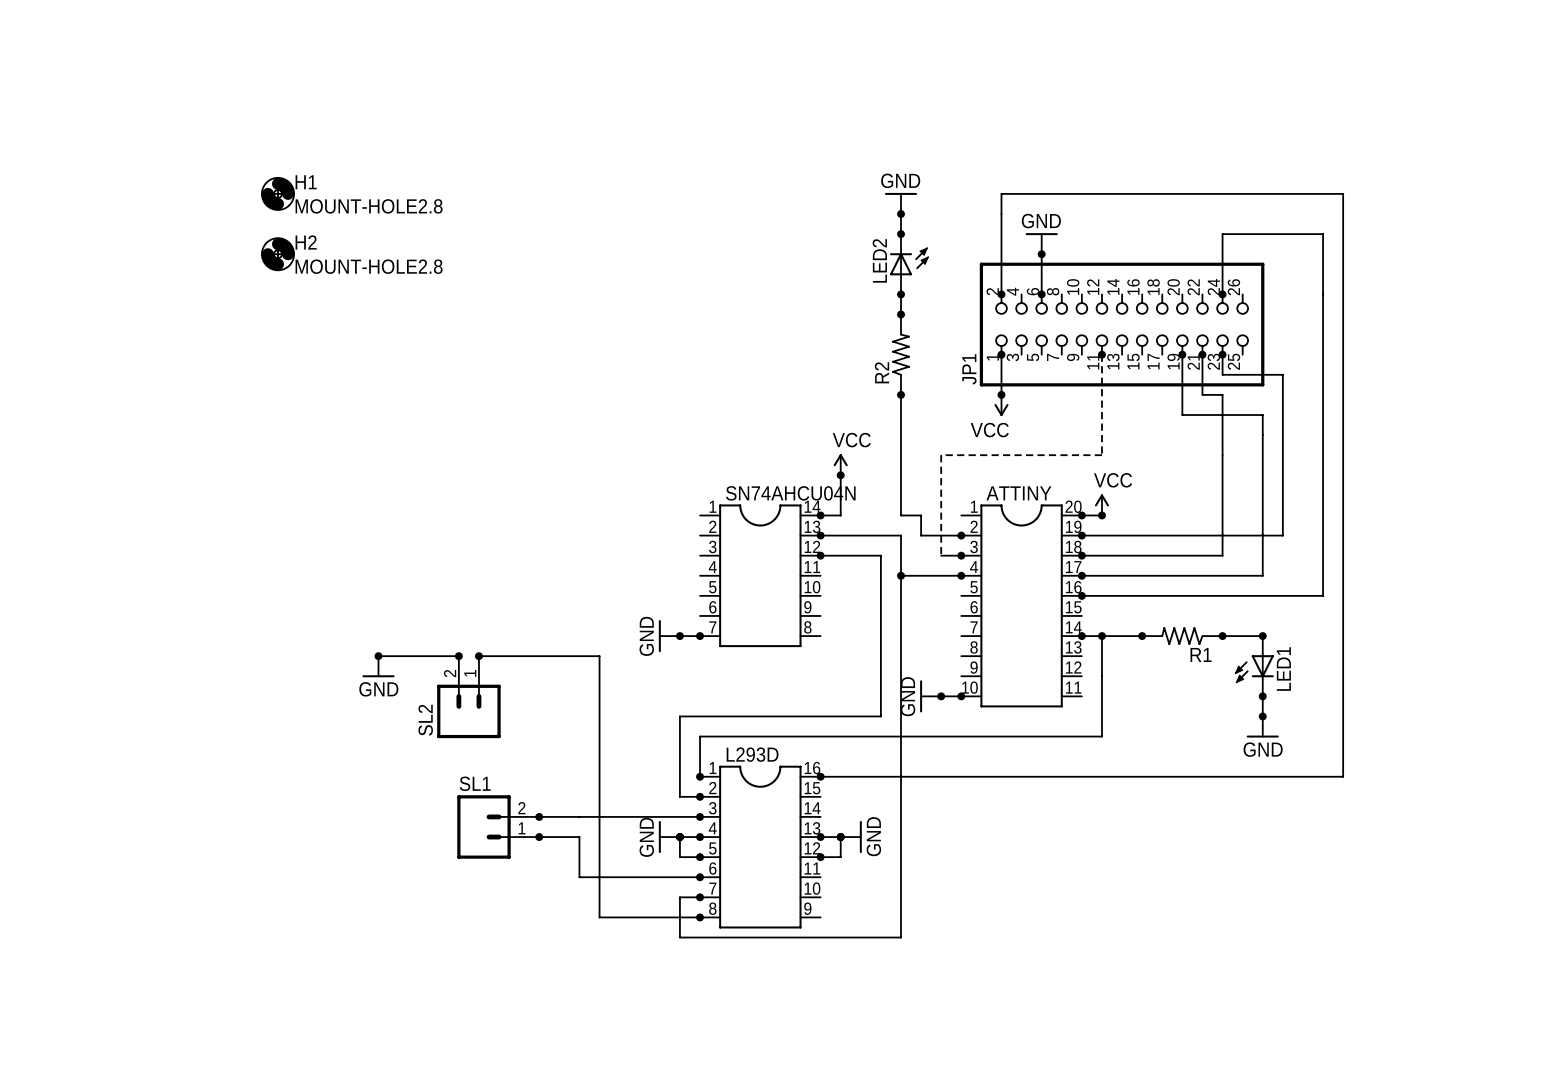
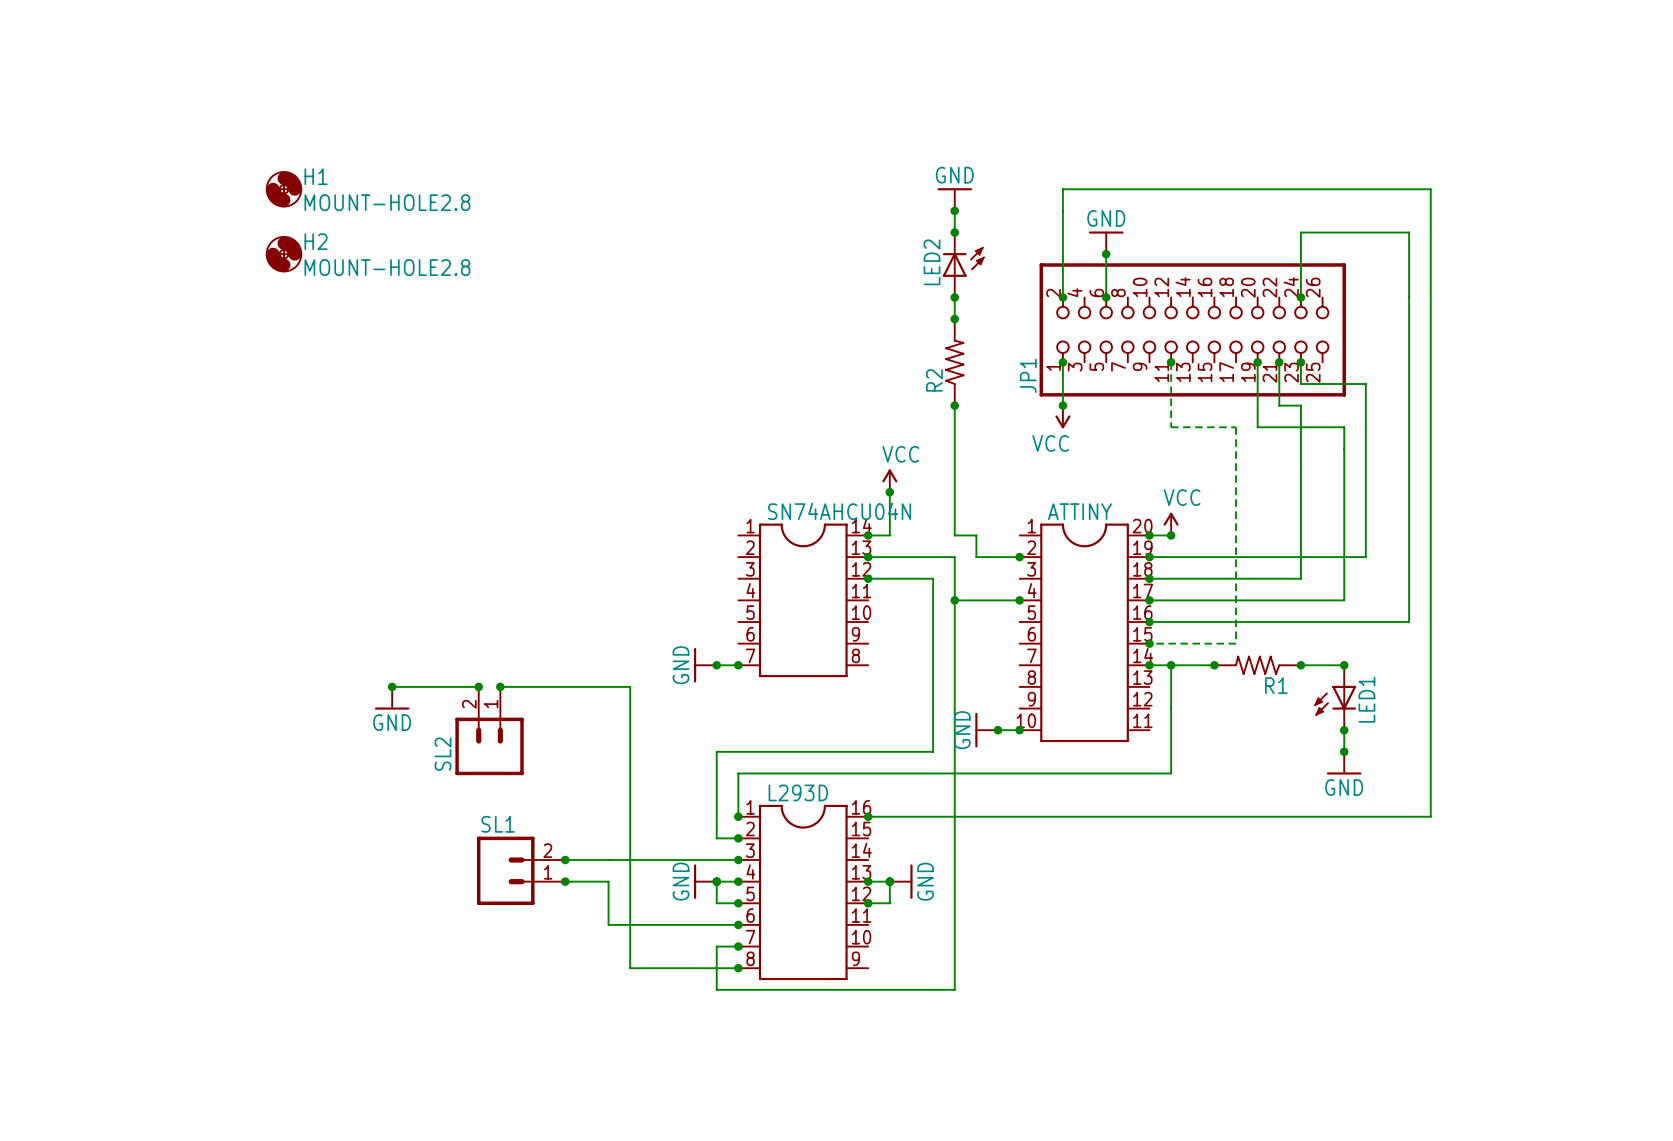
wire: (1101, 415) (1101, 455) (941, 455) (941, 555) (961, 555) -> (1171, 427) (1236, 427) (1236, 643) (1149, 643)
junction: (961, 555) -> none
junction: none -> (1149, 643)

